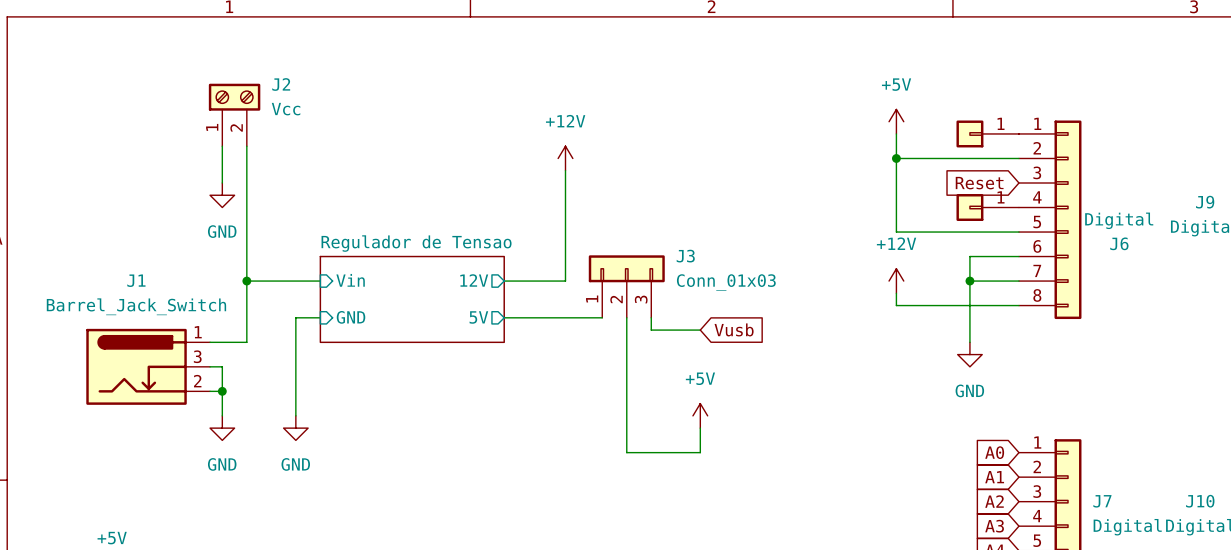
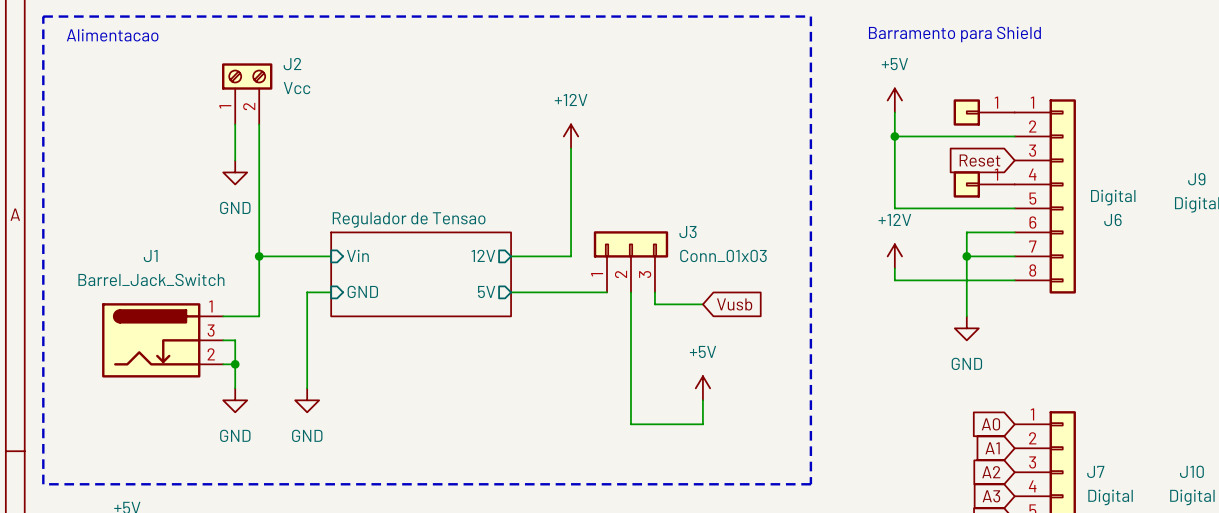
line: none -> (43, 16) (810, 16) (810, 484) (43, 484) (43, 16)
text: none -> Alimentacao (112, 35)
text: none -> Barramento para Shield (954, 34)

